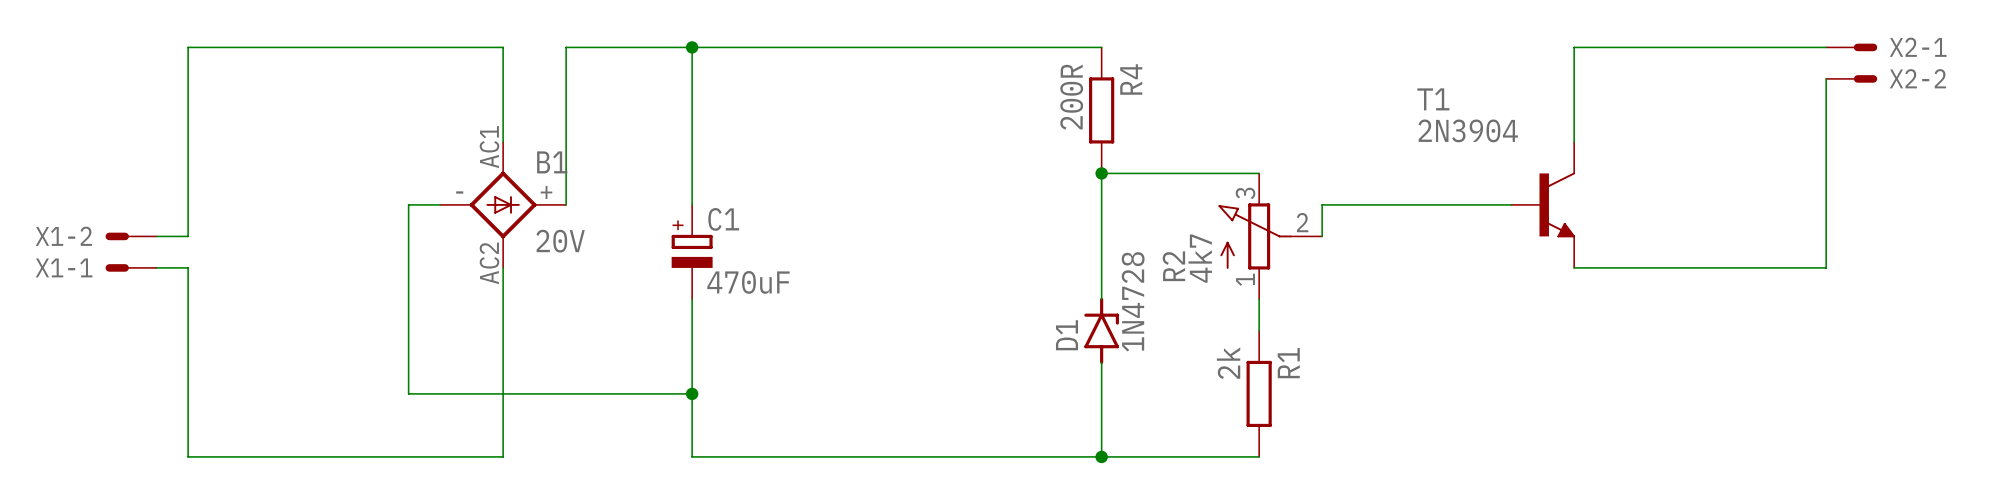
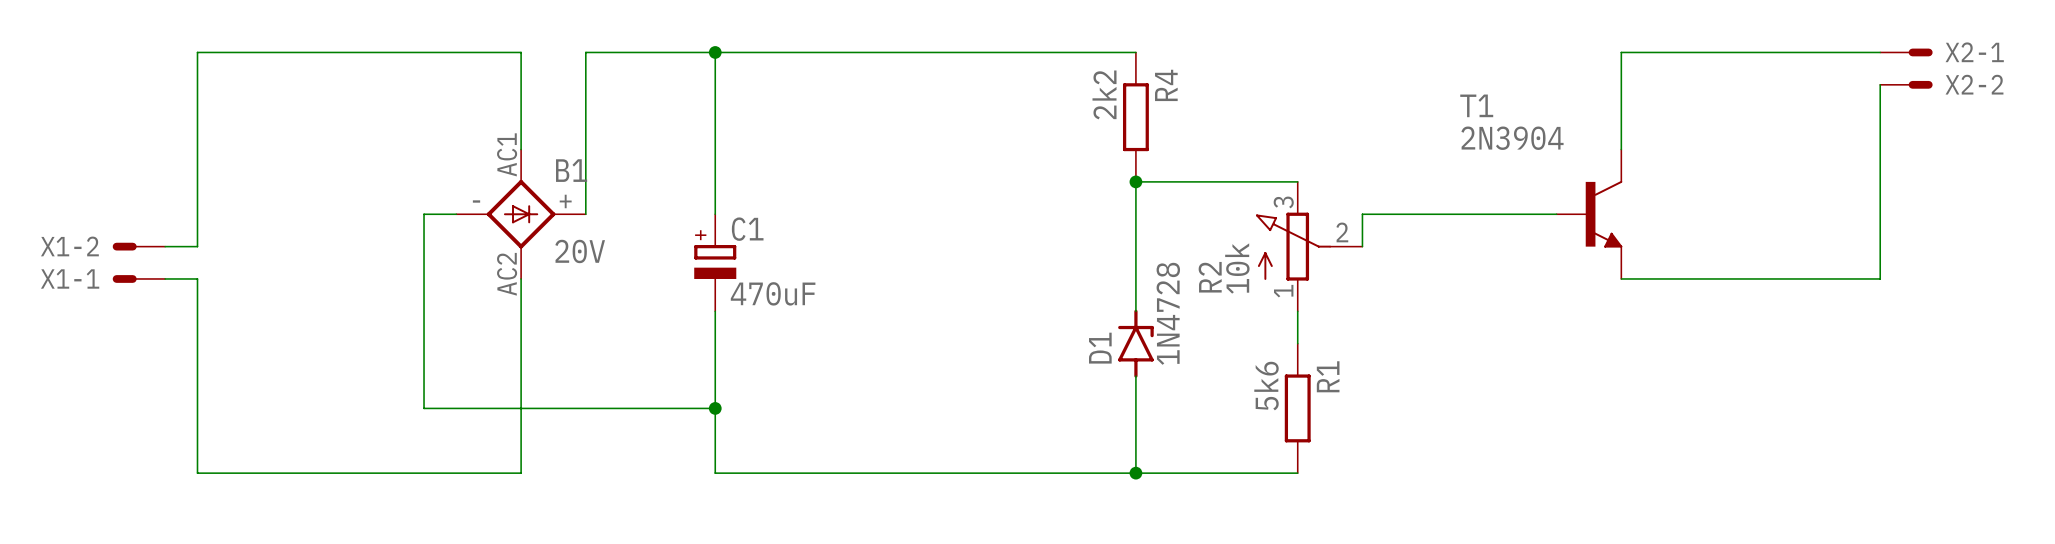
R4 value: 200R (1071, 97) -> 2k2 (1104, 94)
R2 value: 4k7 (1200, 258) -> 10k (1237, 268)
R1 value: 2k (1228, 363) -> 5k6 (1266, 386)

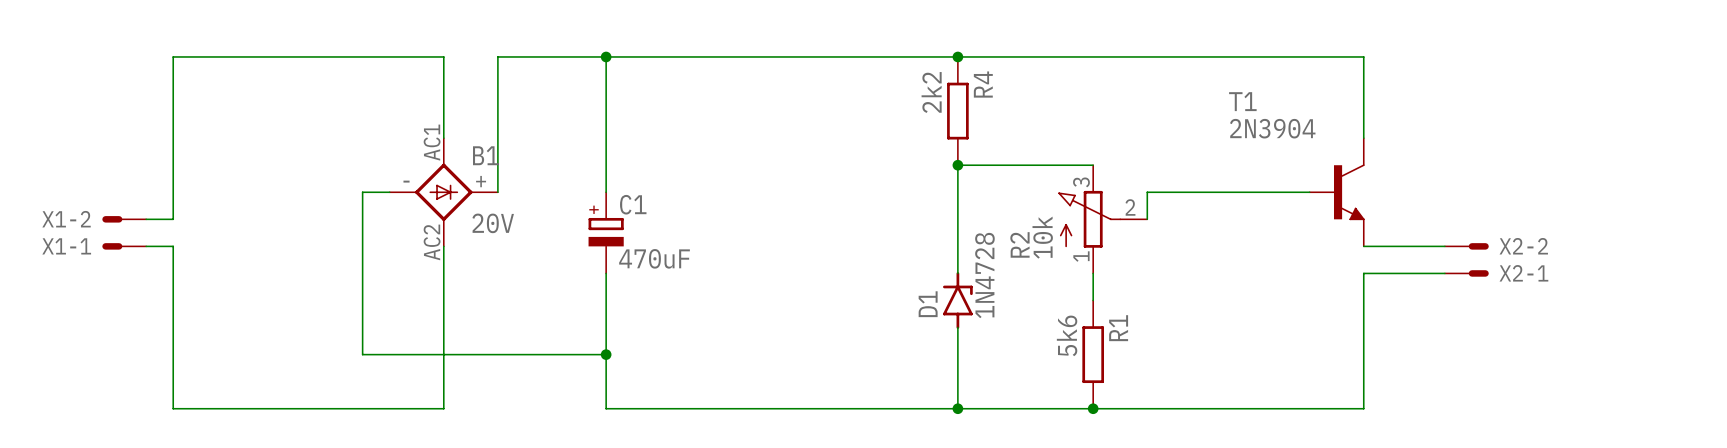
junction: none -> (957, 56)
wire: (1621, 52) (1880, 52) -> (1363, 56) (957, 56)
X2-1 position: (1906, 52) -> (1466, 273)
wire: (1880, 84) (1880, 278) (1718, 278) -> none
X2-2 position: (1906, 84) -> (1466, 246)
wire: none -> (1444, 273) (1363, 273) (1363, 408) (1093, 408)
junction: none -> (1093, 408)

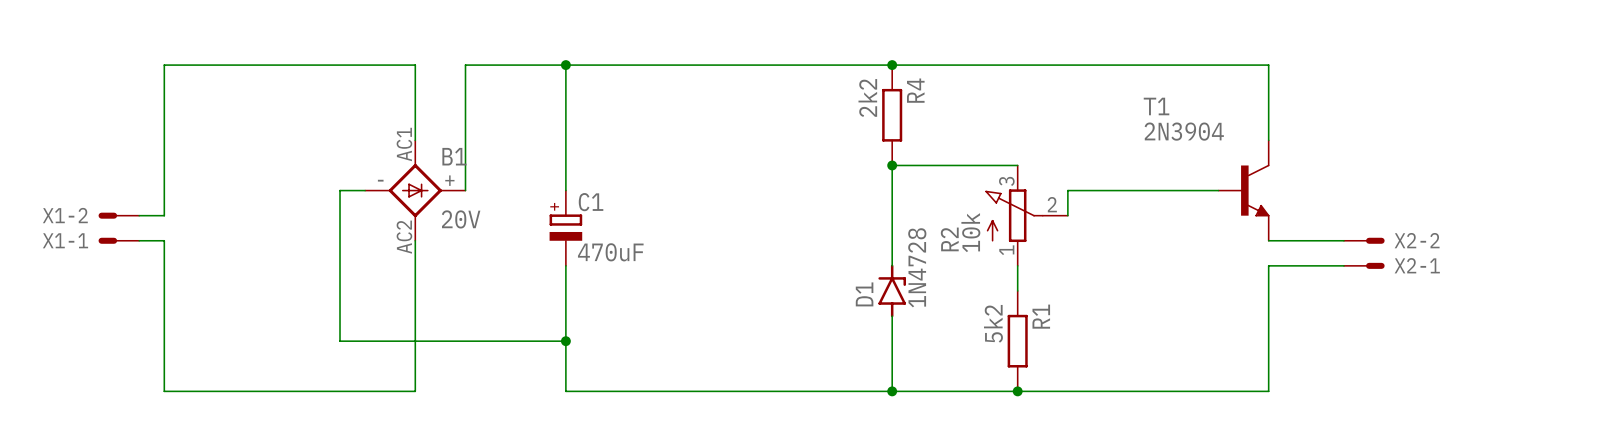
R1 value: 5k6 (1067, 335) -> 5k2 (993, 323)

